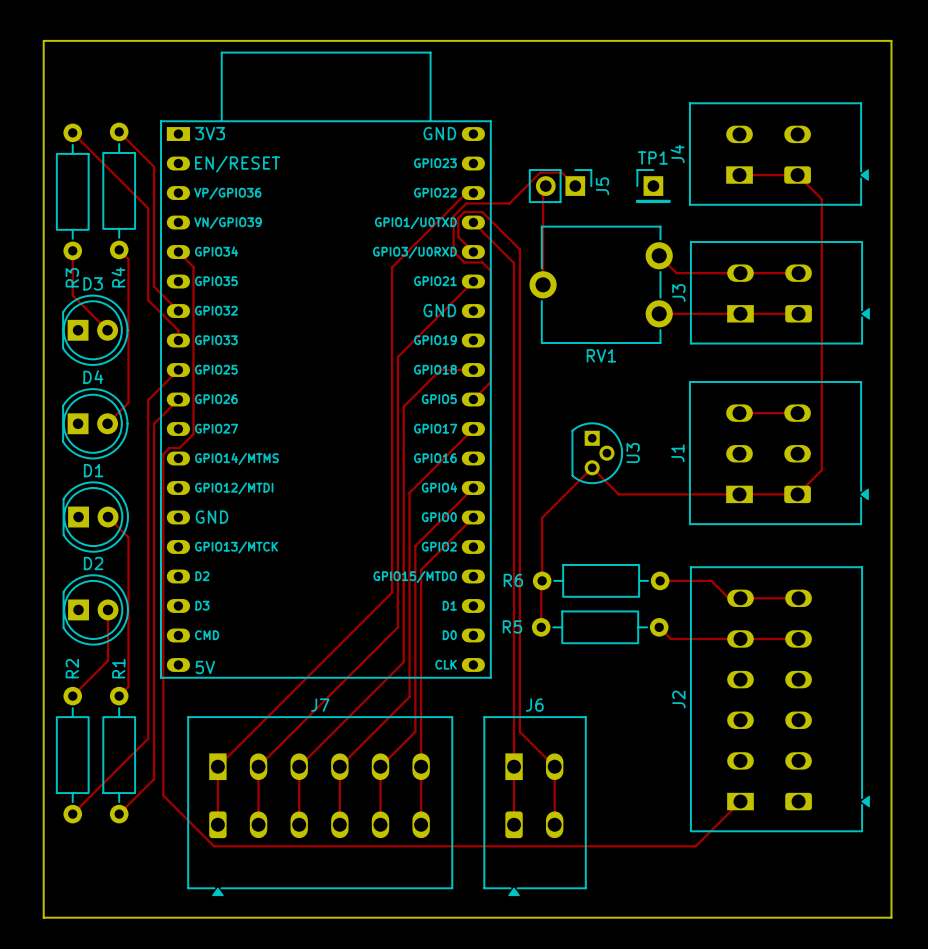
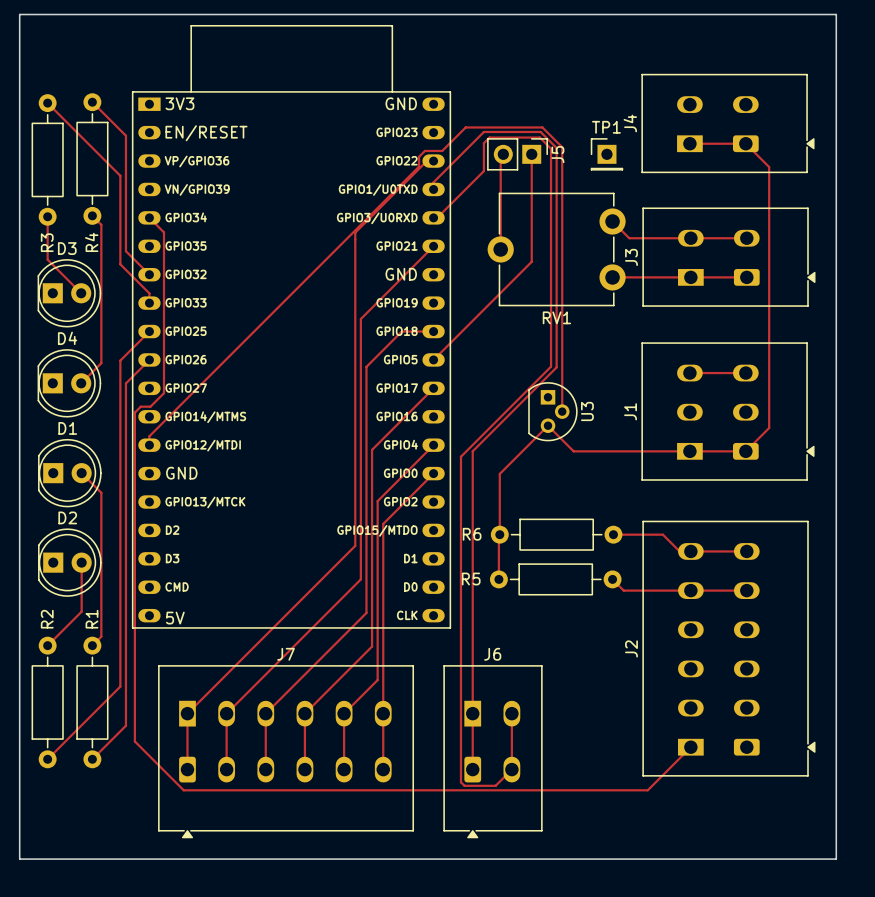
track: (575, 186) (561, 172) (540, 172) (509, 203) (466, 203) (453, 216) (453, 251) (464, 262) (482, 262) (490, 270) (490, 382) -> (531, 154) (531, 261) (450, 343)
track: (473, 222) (514, 263) (514, 494) -> (433, 189) (433, 182) (483, 131) (540, 131) (556, 147) (556, 367) (472, 451)
track: (473, 252) (458, 236) (458, 218) (464, 212) (482, 212) (519, 249) (519, 731) (554, 766) -> (433, 217) (437, 217) (483, 171) (483, 143) (489, 137) (539, 137) (551, 148) (551, 366) (460, 456) (460, 782) (464, 785) (495, 785) (511, 769)
track: none -> (562, 411) (562, 147) (542, 127) (465, 127) (442, 150) (424, 150) (419, 156) (419, 166) (149, 436) (149, 445)

